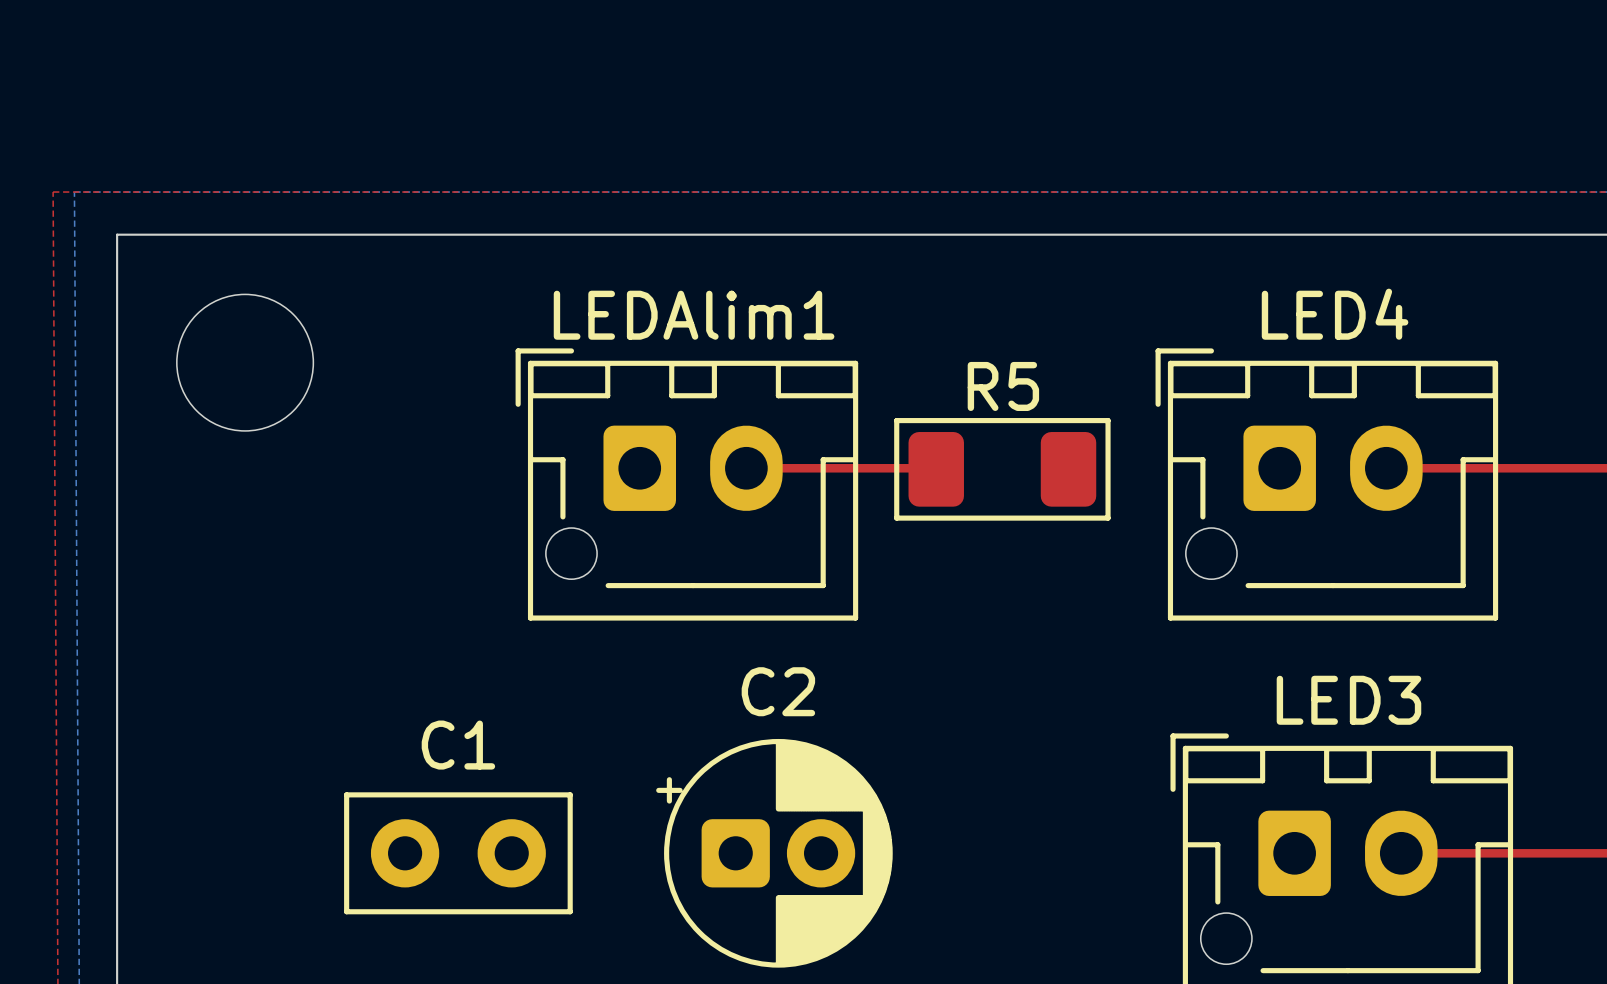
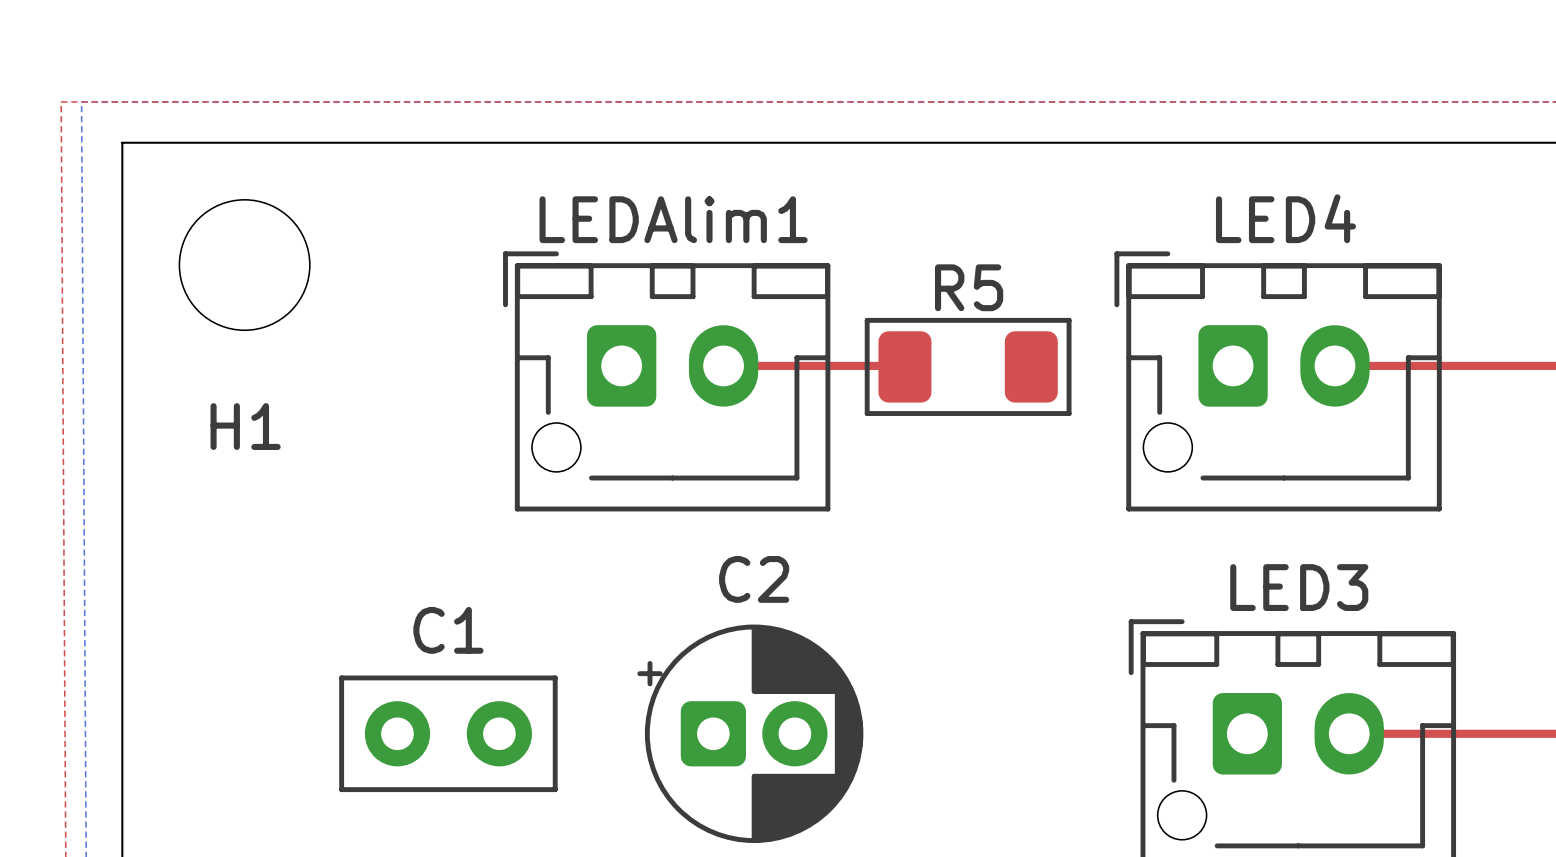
H1 name: none -> H1 (245, 426)

